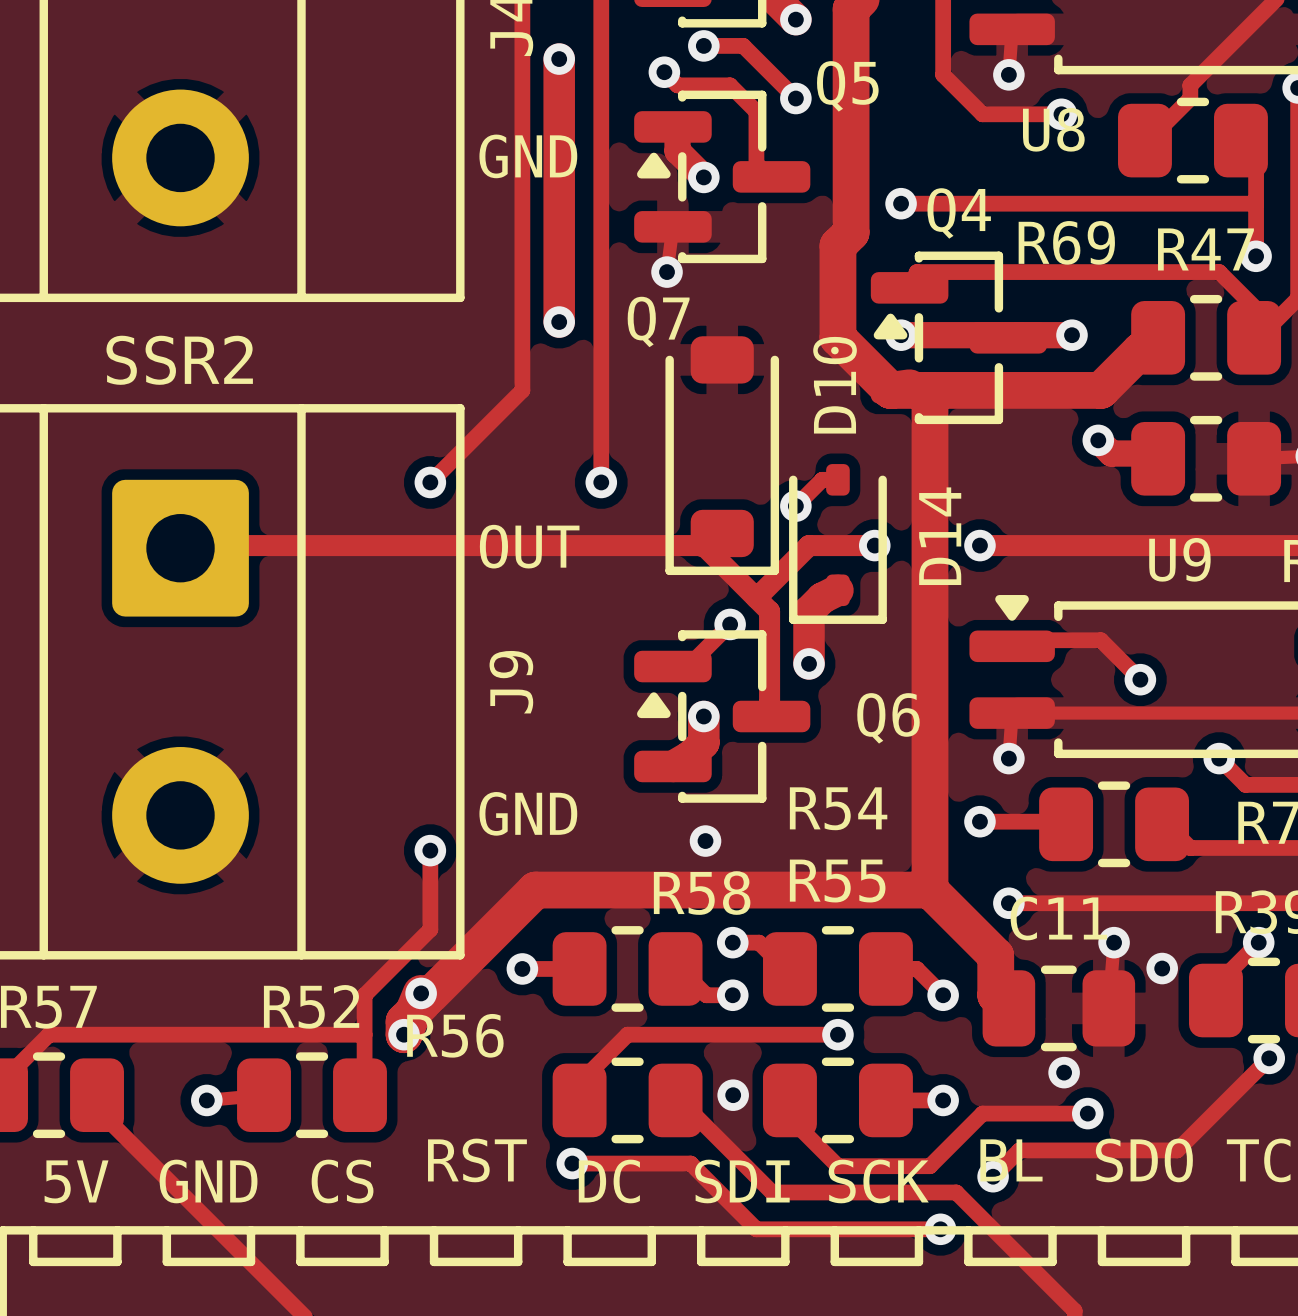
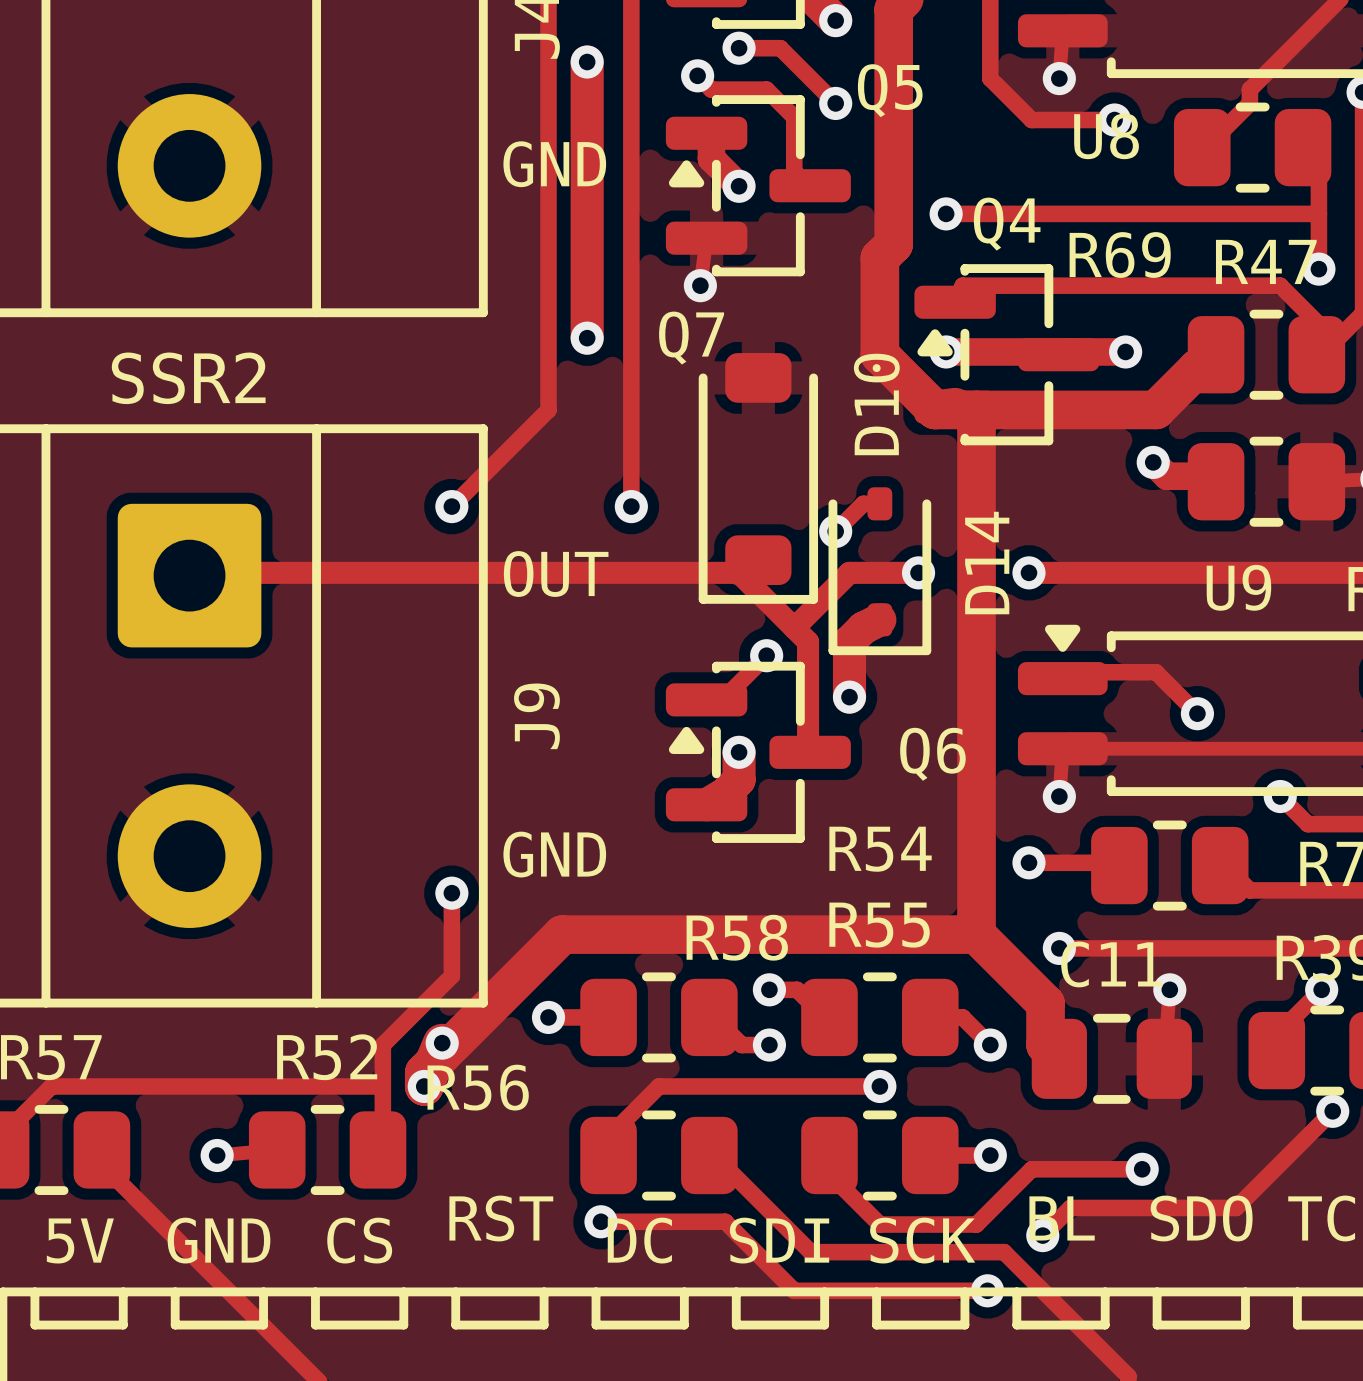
via: (705, 841) -> none
via: (1162, 968) -> none
via: (1064, 1072) -> none
via: (733, 1095) -> none

